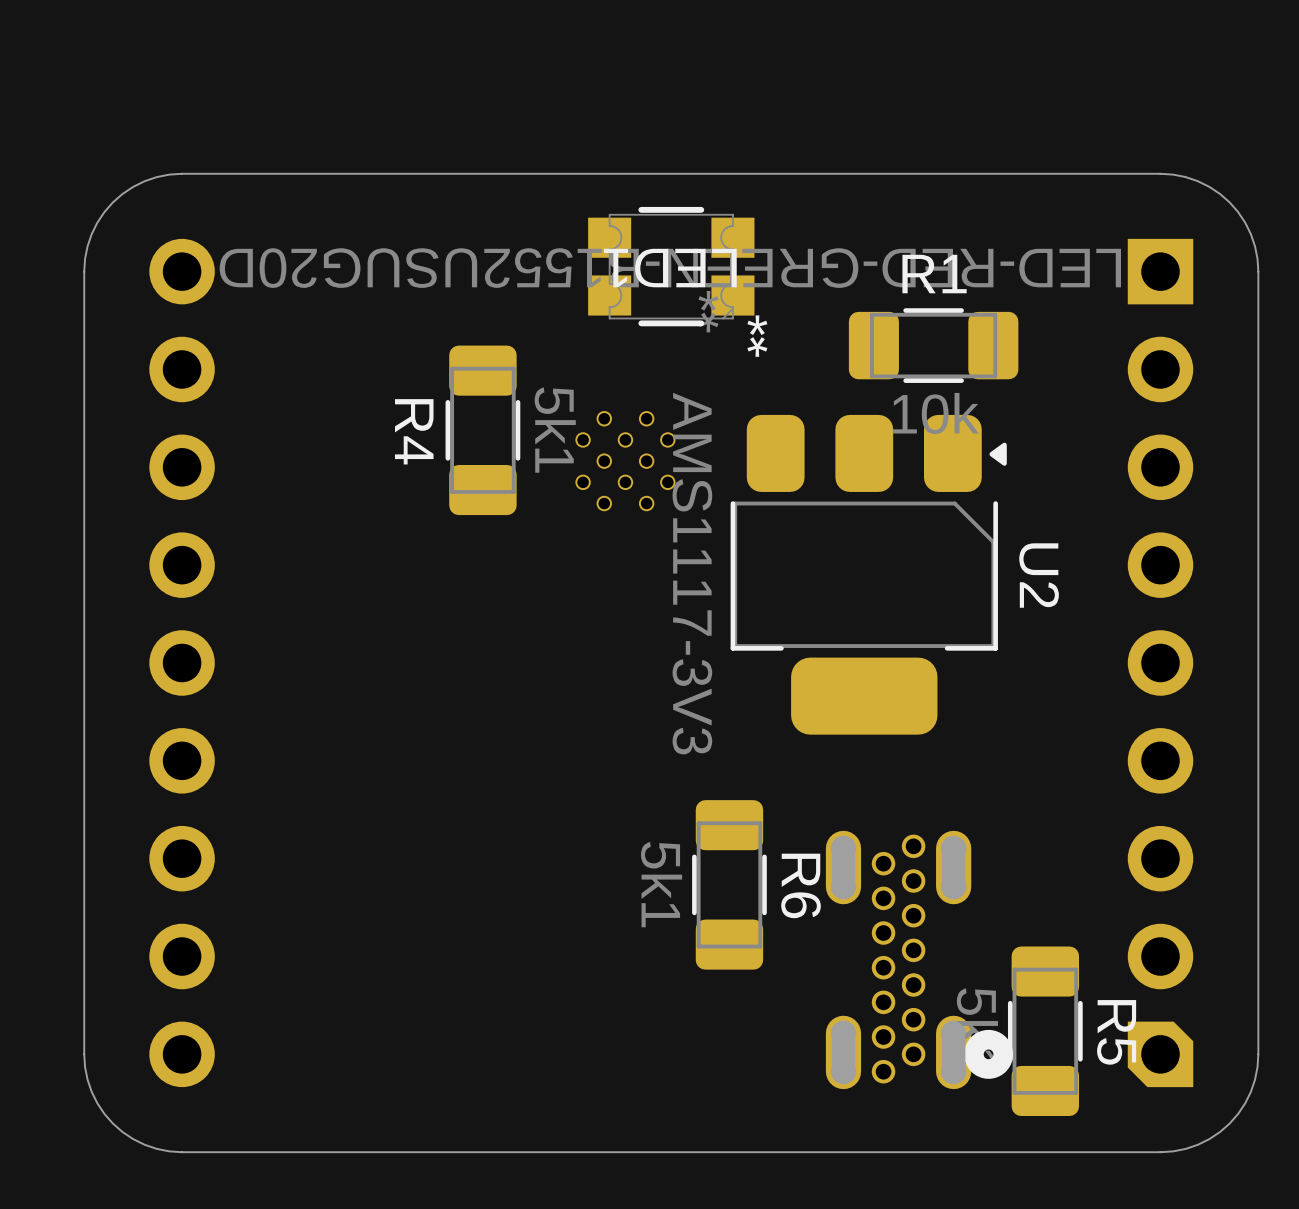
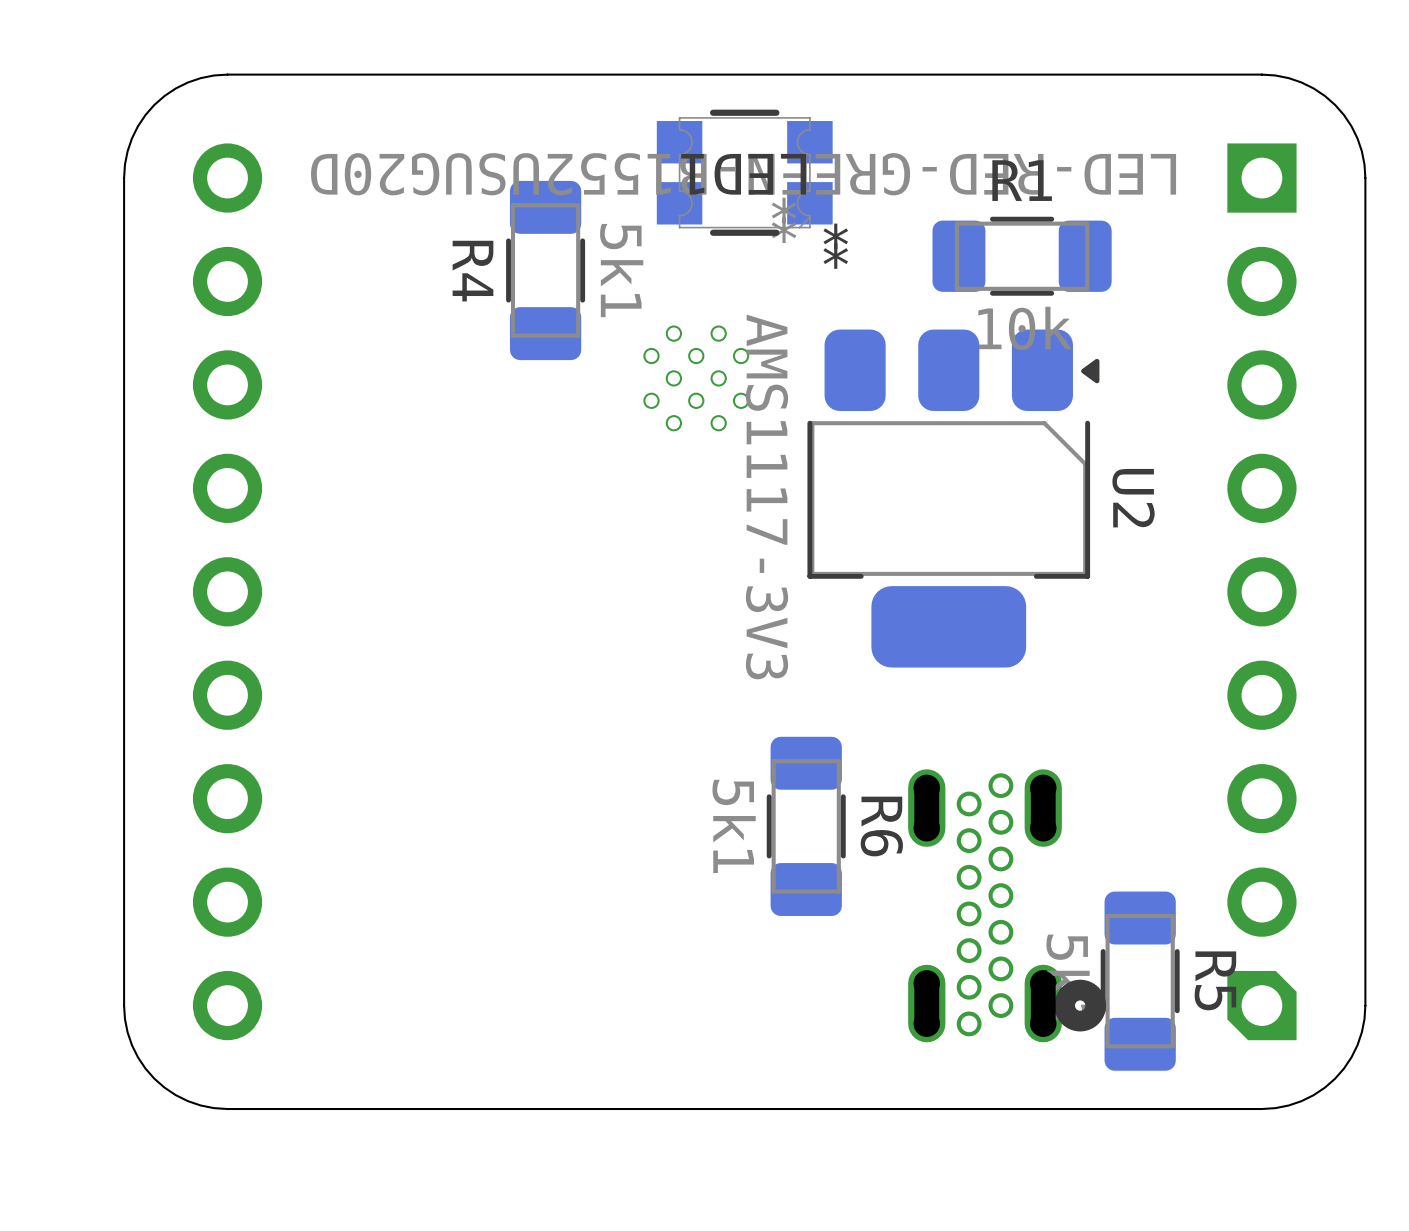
R4 position: (482, 430) -> (545, 270)

